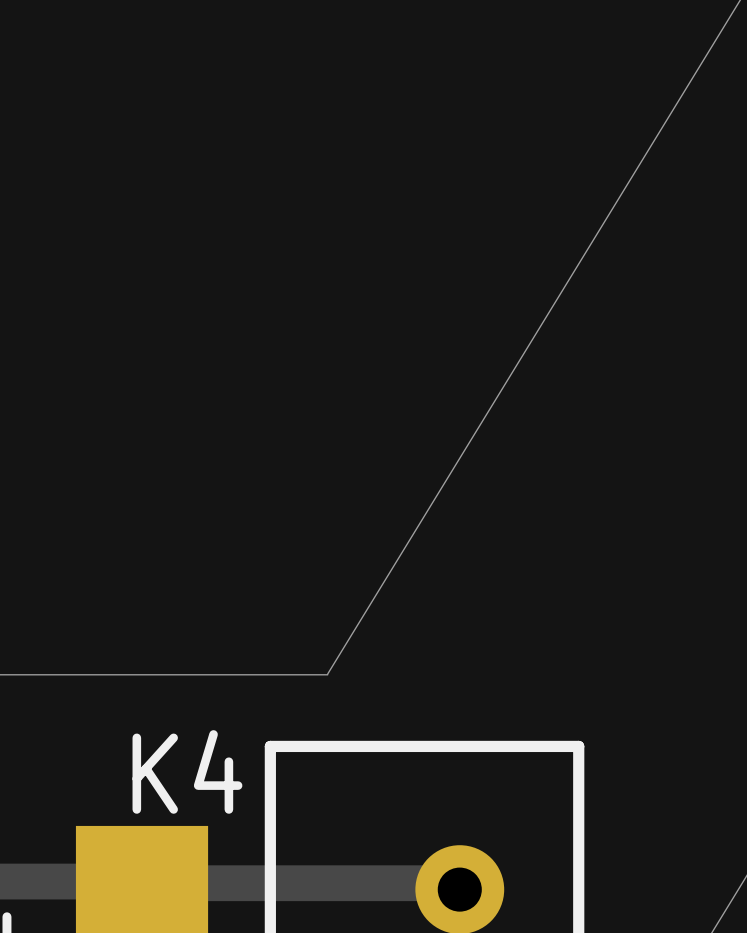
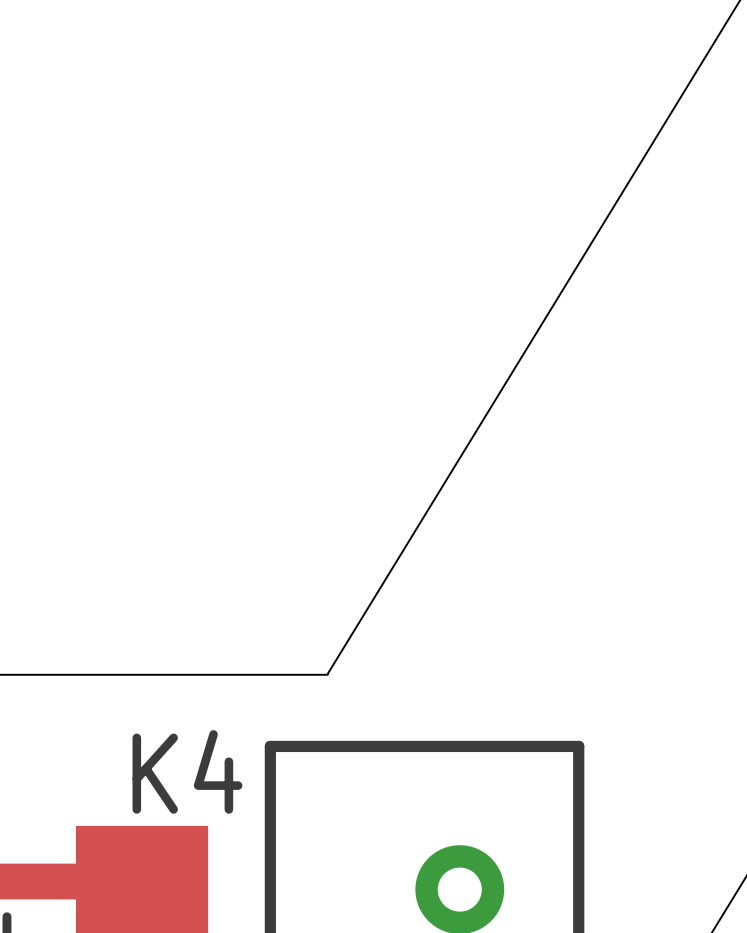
track: (142, 883) (453, 883) -> none

